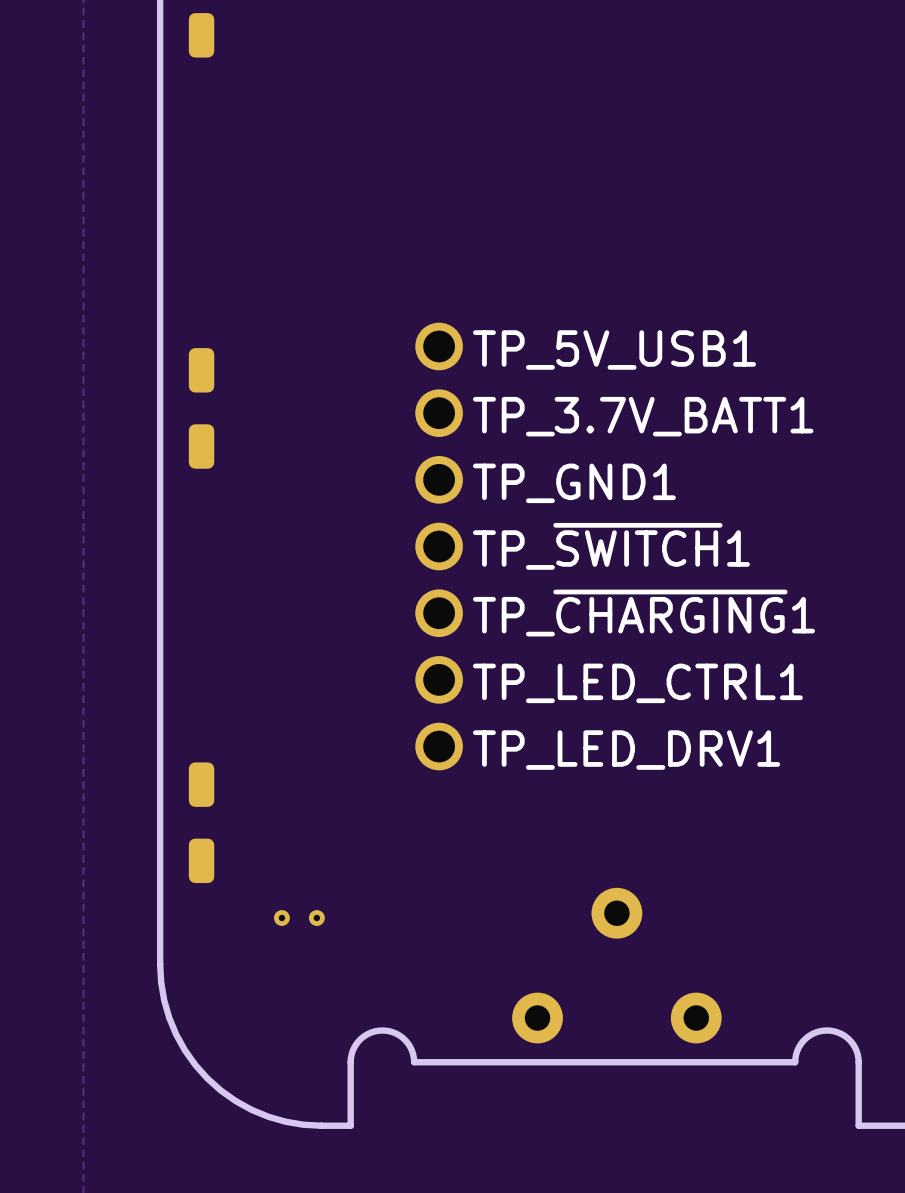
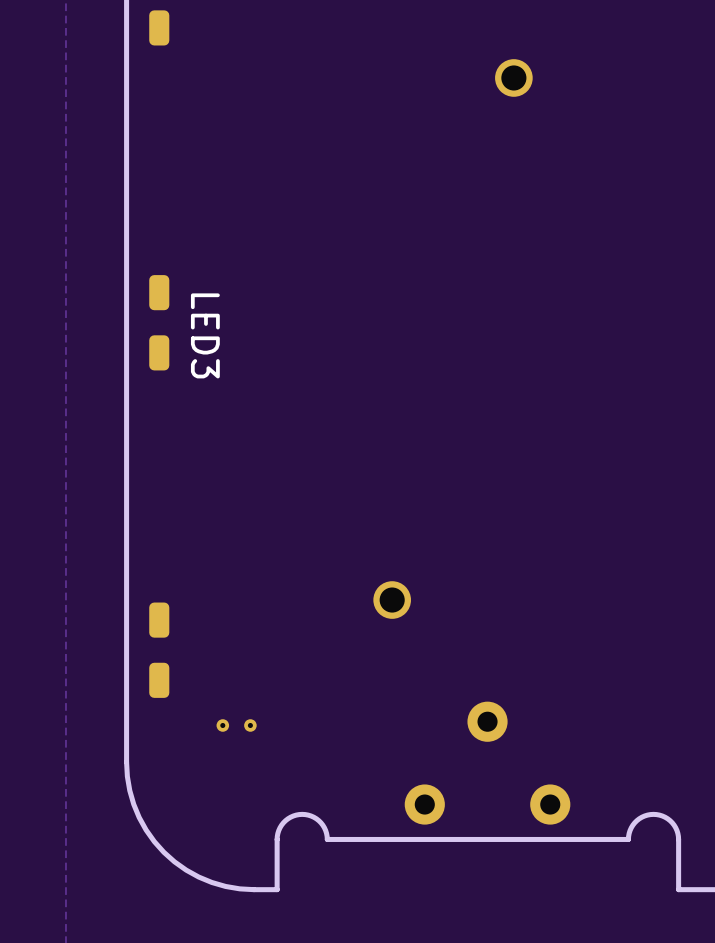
TP_5V_USB1 position: (439, 346) -> (392, 600)
TP_3.7V_BATT1 position: (439, 413) -> (513, 77)
LED3 name: none -> LED3 (205, 335)
TP_GND1: (439, 479) -> none
TP_~{SWITCH}1: (439, 546) -> none
TP_~{CHARGING}1: (439, 613) -> none
TP_LED_CTRL1: (439, 679) -> none
TP_LED_DRV1: (439, 746) -> none

